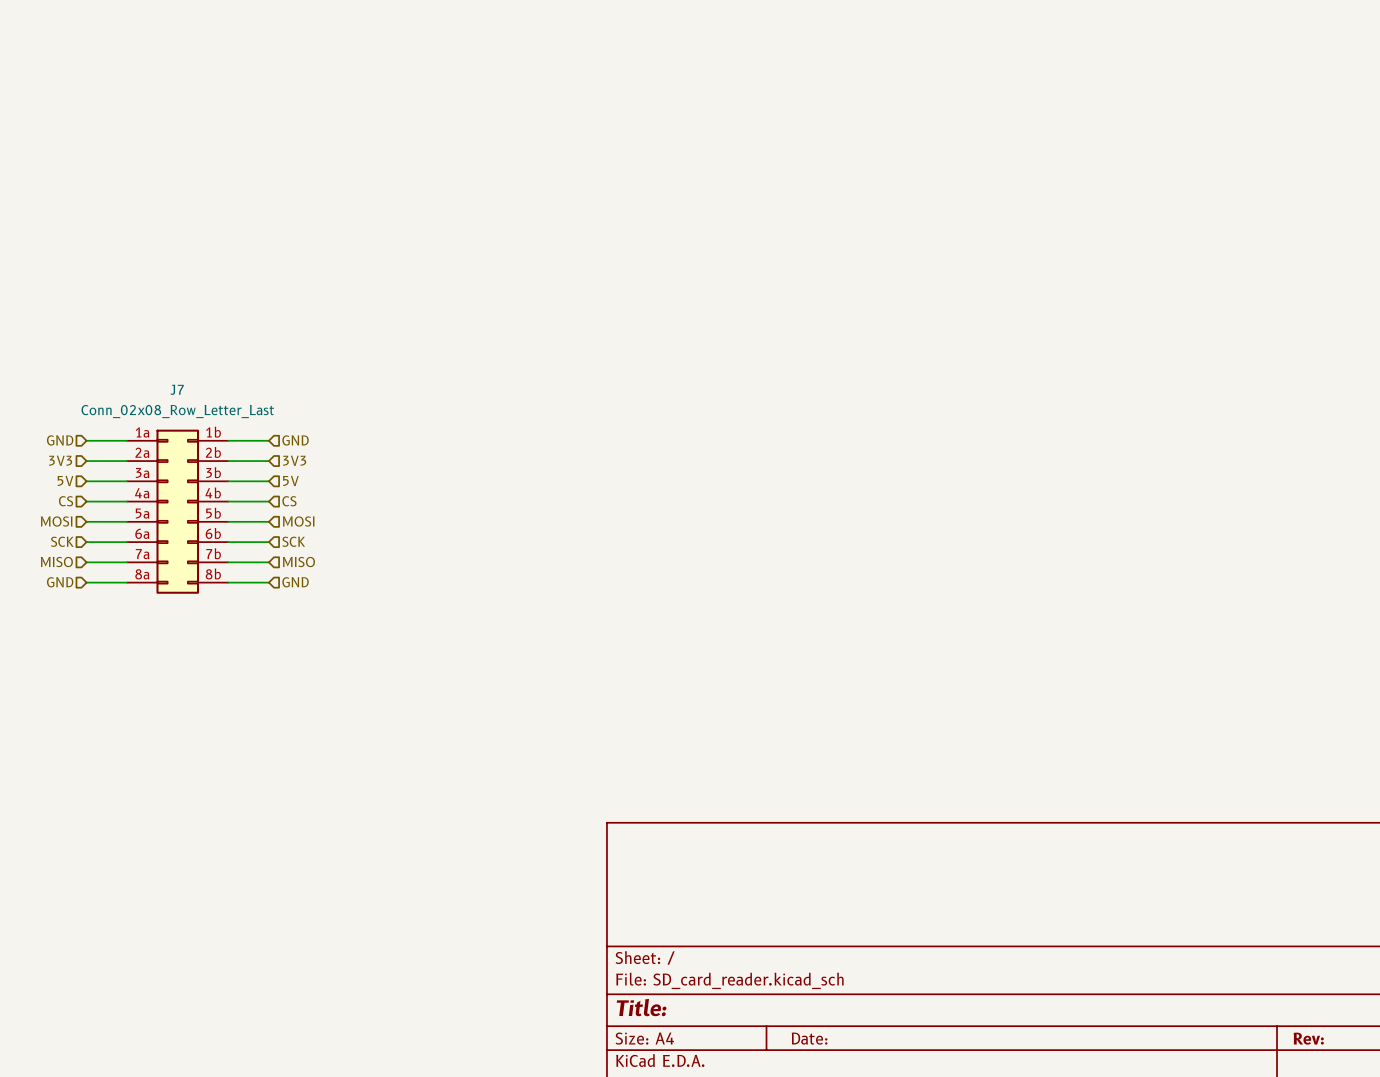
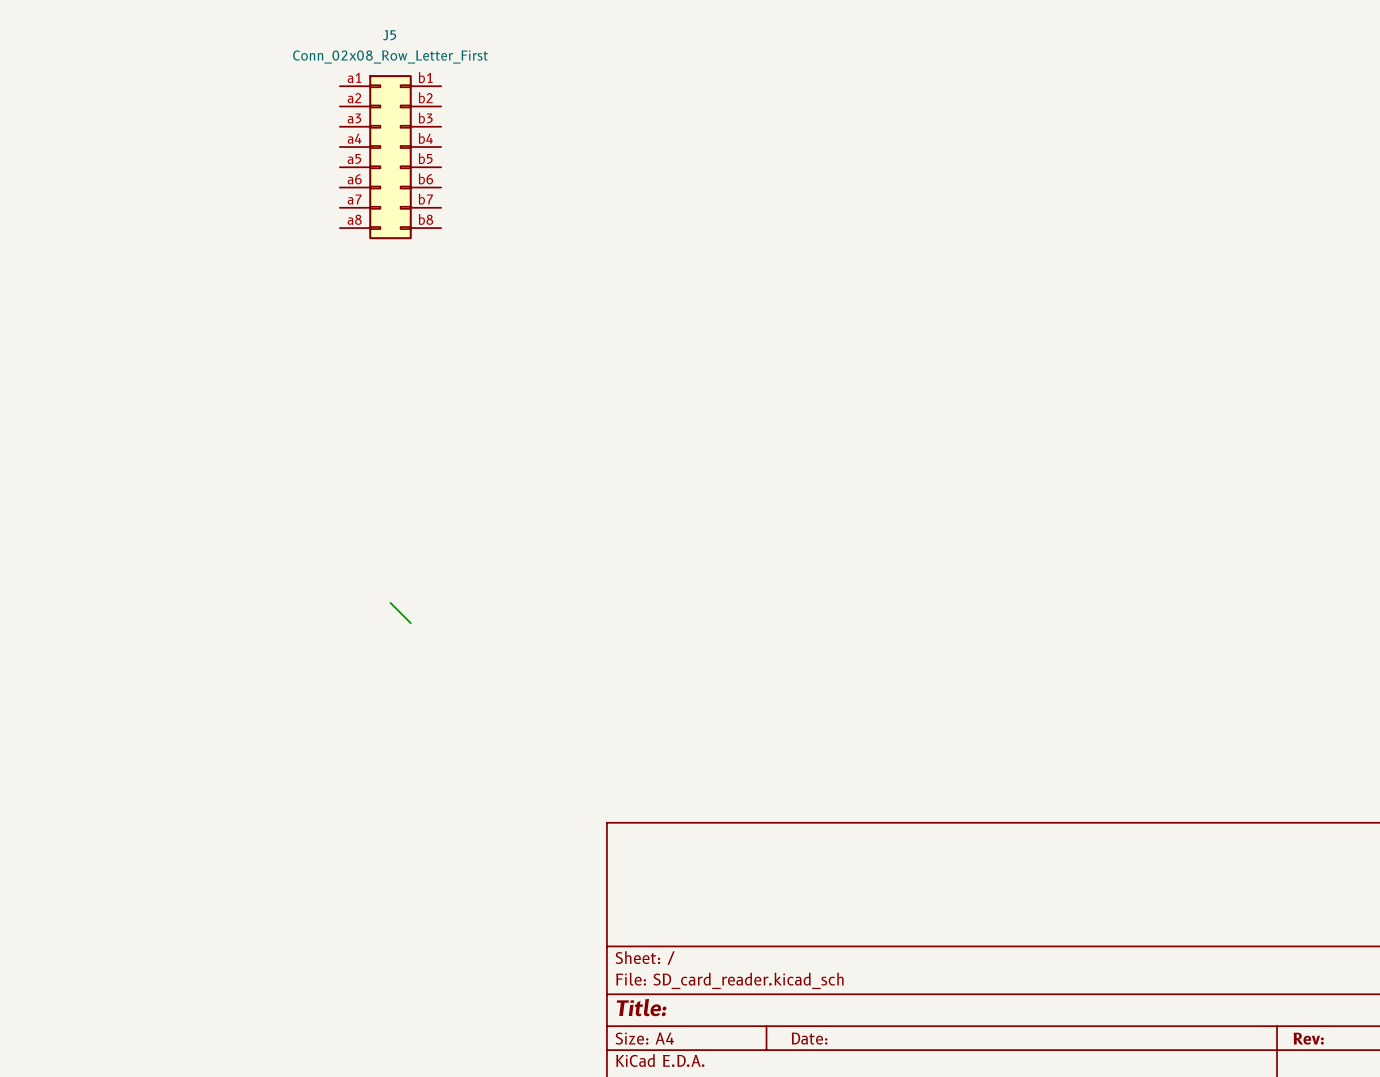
J5: none -> Conn_02x08_Row_Letter_First (390, 157)
hierarchical label: GND (60, 440) -> none
wire: (86, 440) (127, 440) -> none
wire: (228, 440) (268, 440) -> none
hierarchical label: GND (295, 440) -> none
hierarchical label: 3V3 (60, 460) -> none
hierarchical label: 3V3 (294, 460) -> none
wire: (86, 461) (127, 461) -> none
wire: (228, 461) (268, 461) -> none
hierarchical label: 5V (65, 480) -> none
hierarchical label: 5V (290, 480) -> none
wire: (86, 481) (127, 481) -> none
wire: (228, 481) (268, 481) -> none
hierarchical label: CS (66, 501) -> none
wire: (86, 501) (127, 501) -> none
wire: (228, 501) (268, 501) -> none
hierarchical label: CS (289, 501) -> none
J7: Conn_02x08_Row_Letter_Last (177, 511) -> none
hierarchical label: MOSI (56, 521) -> none
wire: (86, 521) (127, 521) -> none
wire: (228, 521) (268, 521) -> none
hierarchical label: MOSI (298, 521) -> none
hierarchical label: SCK (62, 541) -> none
hierarchical label: SCK (293, 541) -> none
wire: (86, 542) (127, 542) -> none
wire: (228, 542) (268, 542) -> none
hierarchical label: MISO (56, 562) -> none
wire: (86, 562) (127, 562) -> none
wire: (228, 562) (268, 562) -> none
hierarchical label: MISO (298, 562) -> none
hierarchical label: GND (60, 582) -> none
wire: (86, 582) (127, 582) -> none
wire: (228, 582) (268, 582) -> none
hierarchical label: GND (295, 582) -> none
wire: none -> (390, 602) (410, 623)

